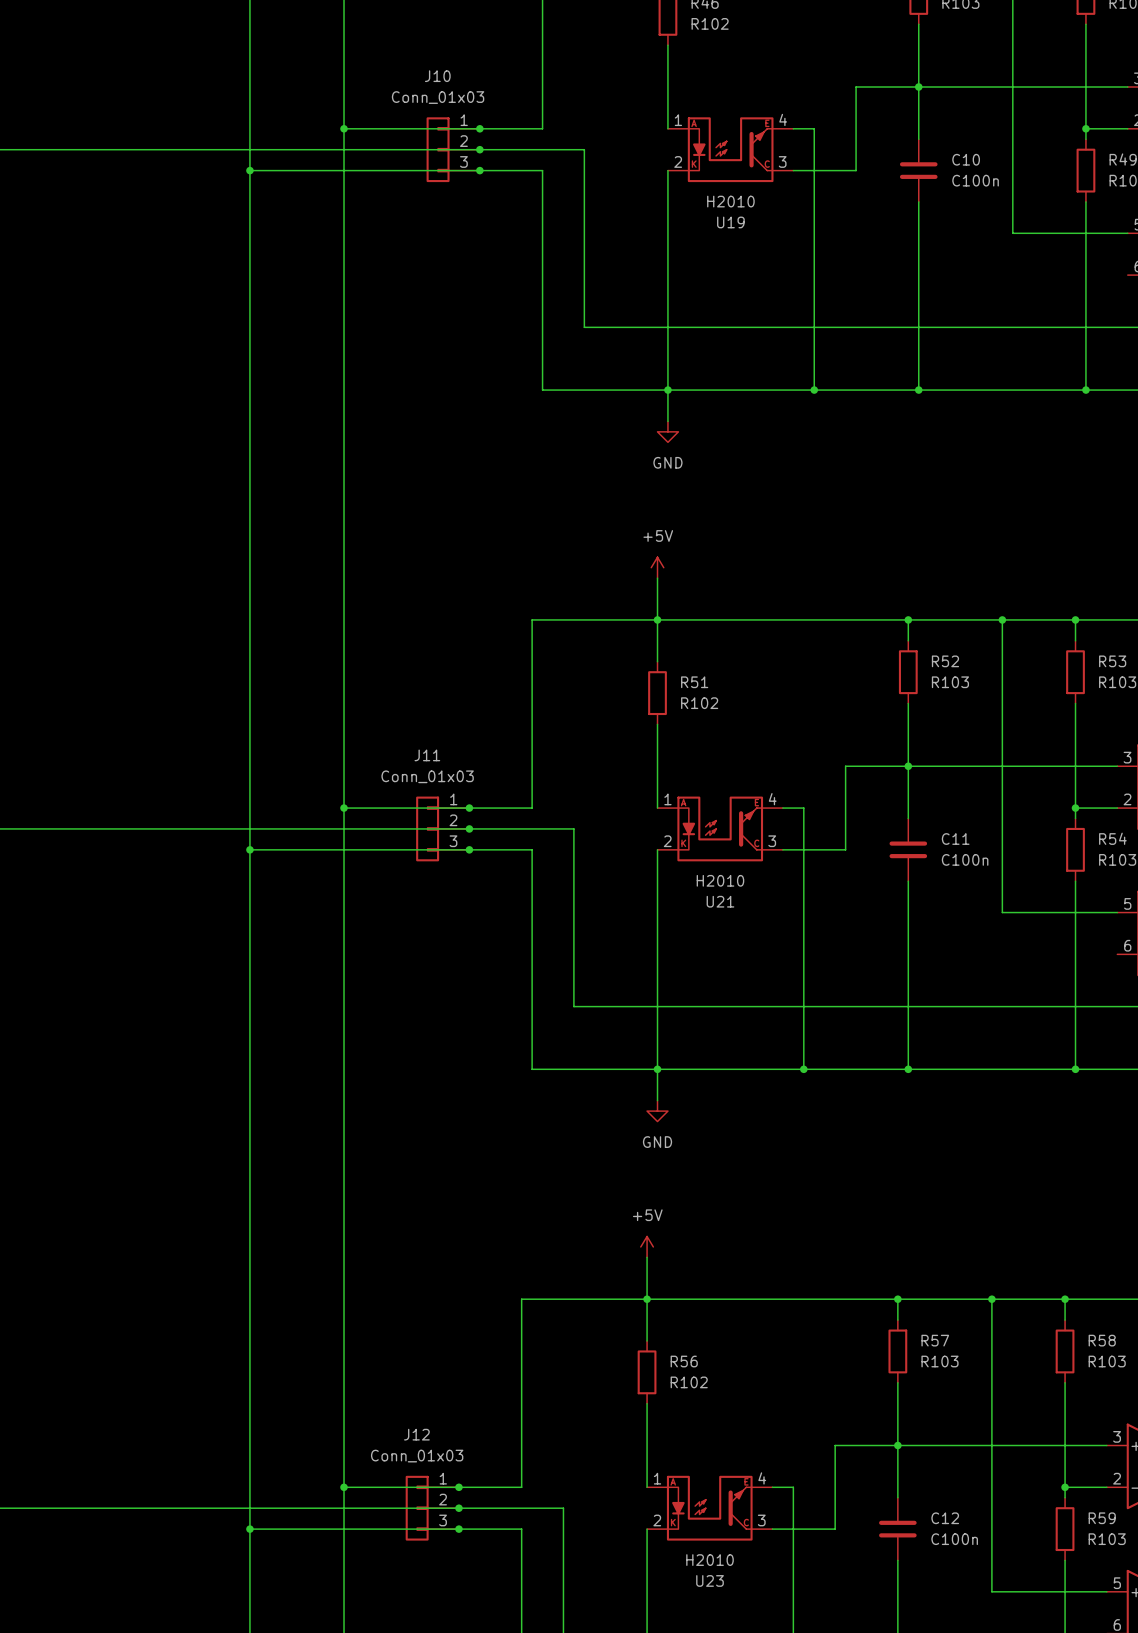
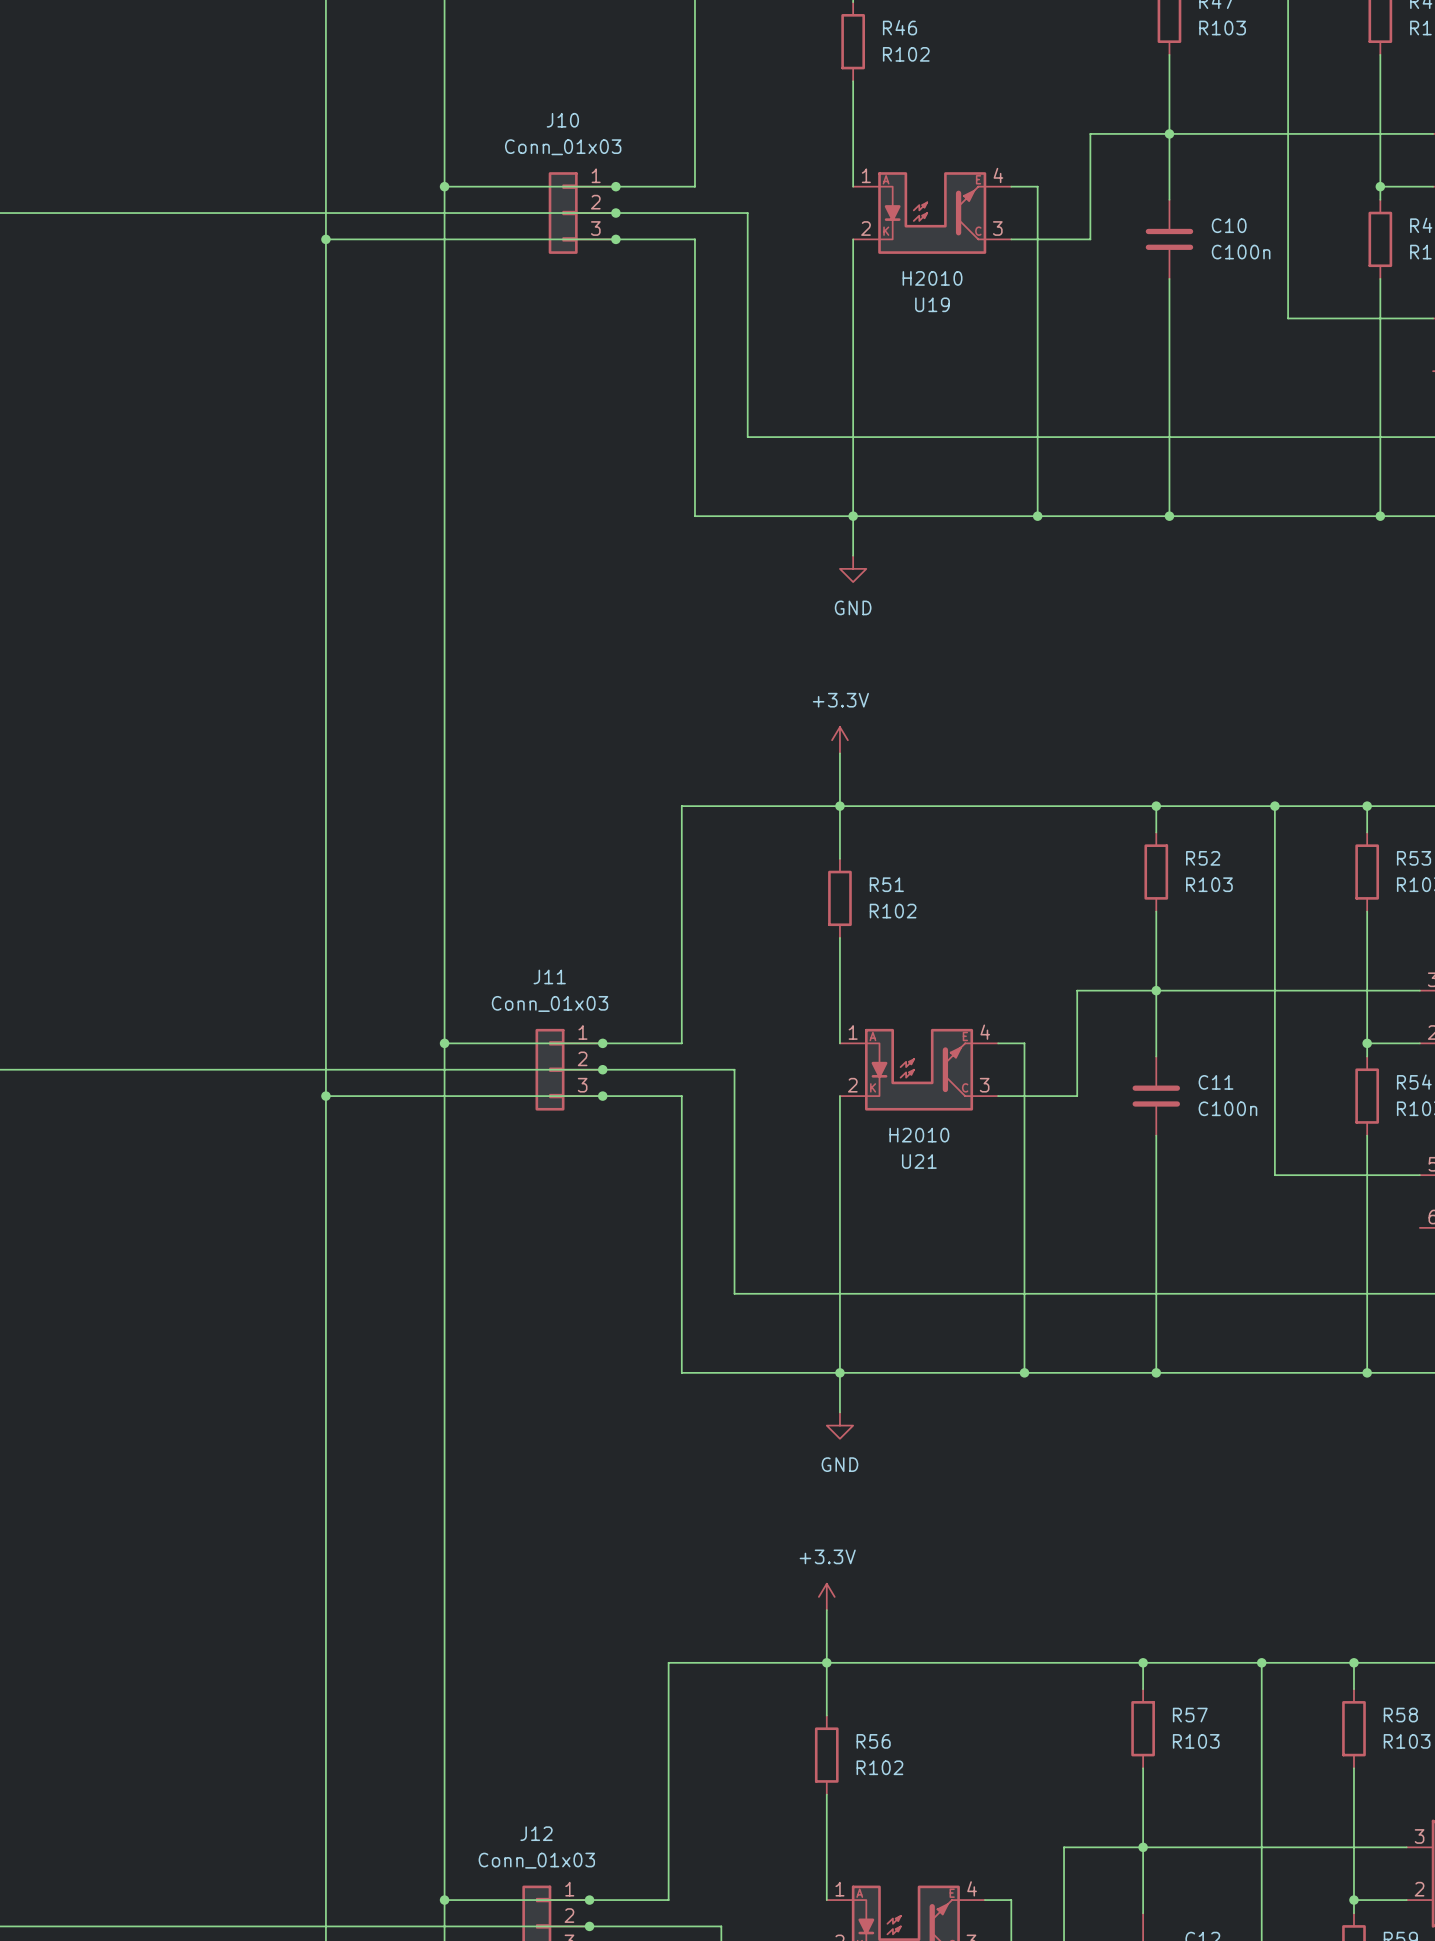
power symbol: +5V (657, 567) -> +3.3V (839, 740)
power symbol: +5V (647, 1246) -> +3.3V (826, 1596)

